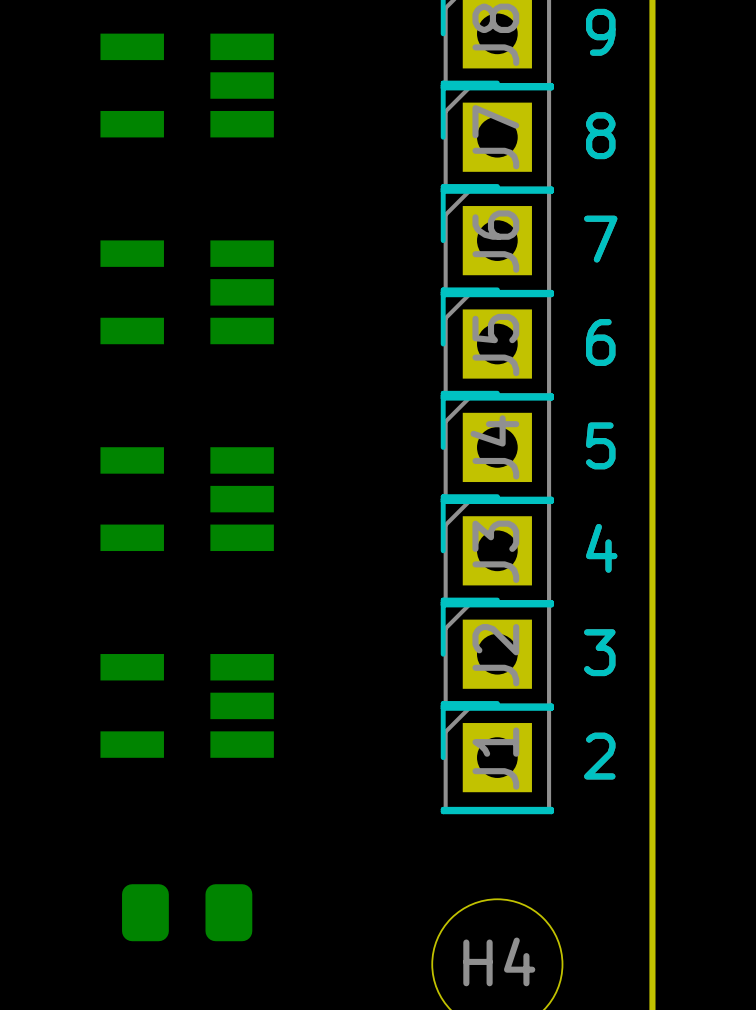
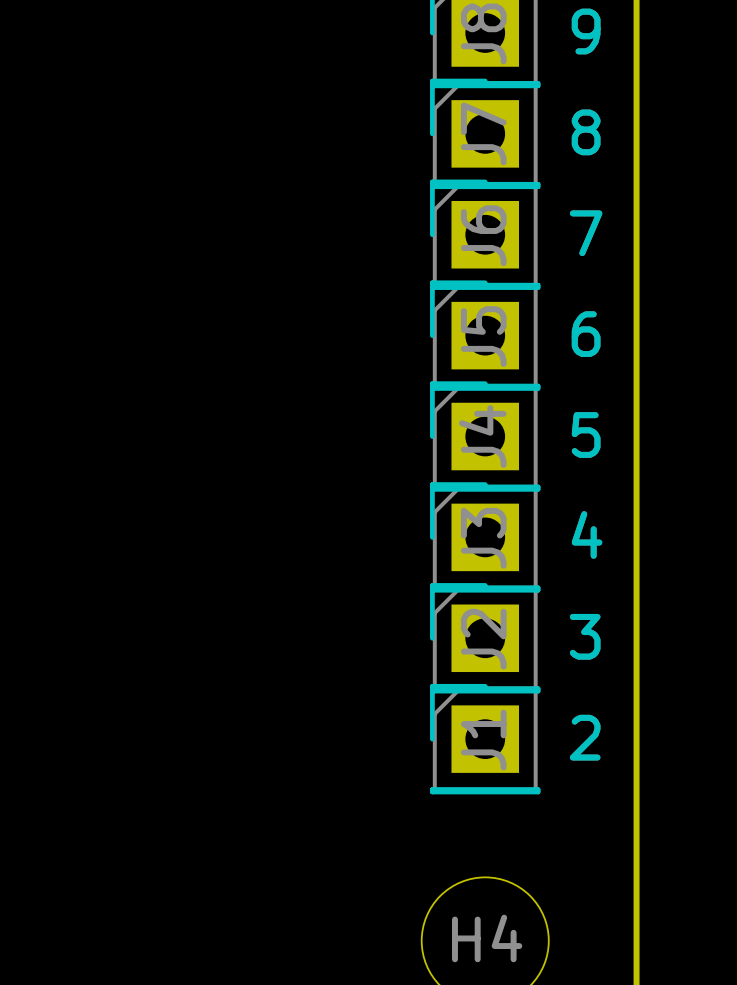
part: (187, 85) -> none
part: (187, 292) -> none
part: (187, 499) -> none
part: (187, 705) -> none
part: (187, 912) -> none

